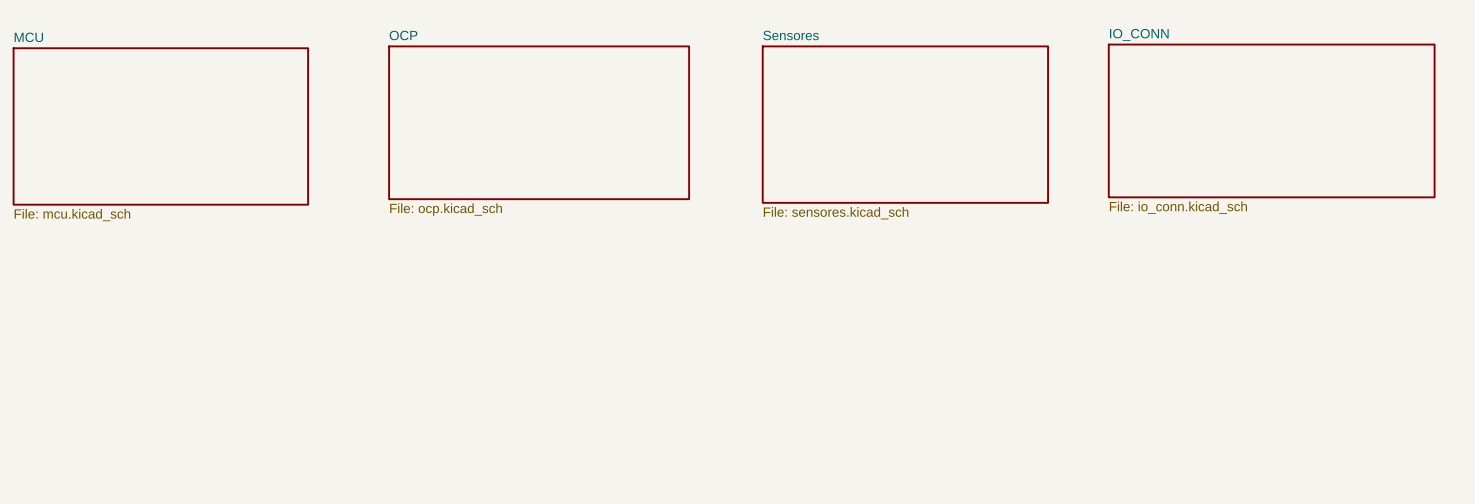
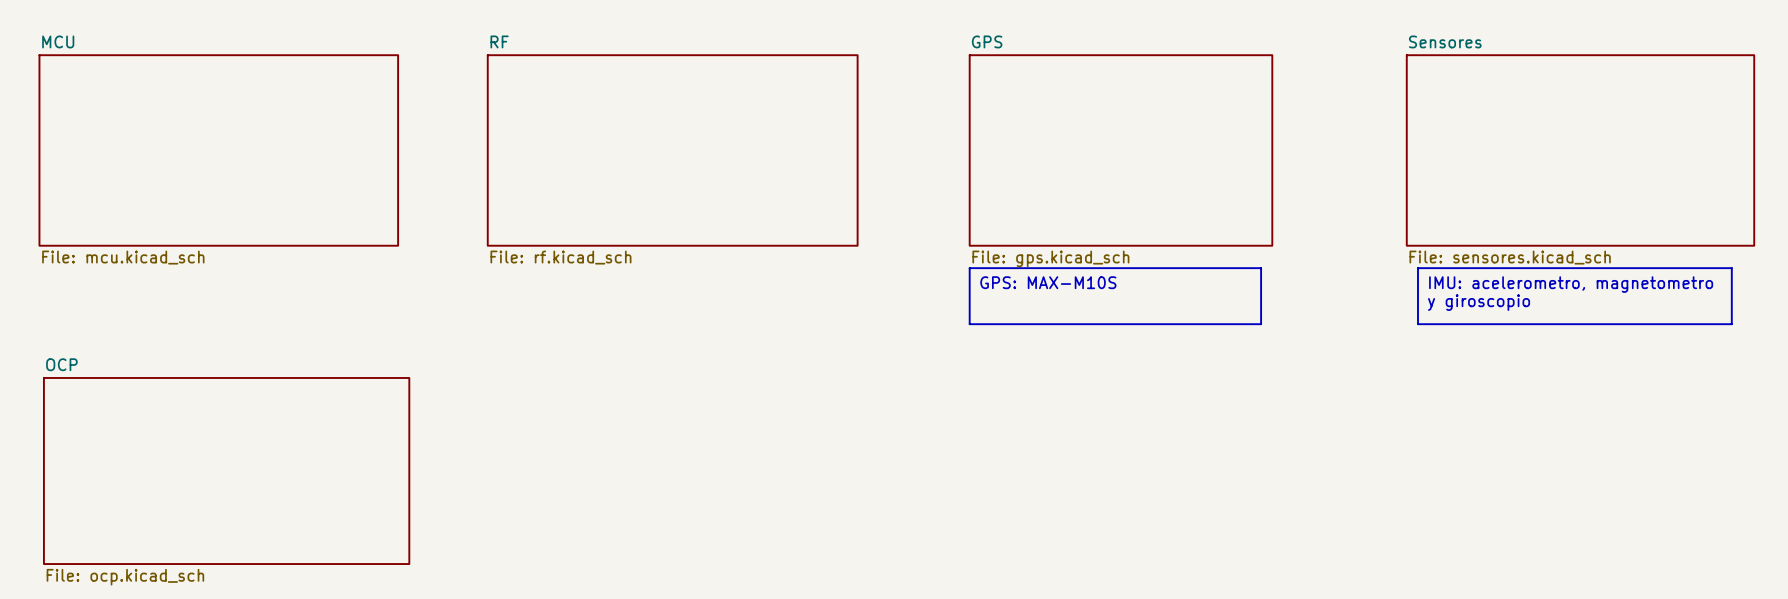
sheet IO_CONN: File: io_conn.kicad_sch (1271, 120) -> none
sheet OCP: File: ocp.kicad_sch (539, 122) -> none
sheet Sensores: File: sensores.kicad_sch (905, 124) -> none
sheet RF: none -> File: rf.kicad_sch (672, 150)
sheet GPS: none -> File: gps.kicad_sch (1120, 150)
sheet Sensores: none -> File: sensores.kicad_sch (1580, 150)
line: none -> (969, 268) (1261, 268) (1261, 324) (969, 324) (969, 268)
line: none -> (1417, 268) (1731, 268) (1731, 324) (1417, 324) (1417, 268)
text: none -> GPS: MAX-M10S (1048, 282)
text: none -> IMU: acelerometro, magnetometro (1571, 284)
text: none -> y giroscopio (1479, 302)
sheet OCP: none -> File: ocp.kicad_sch (226, 471)

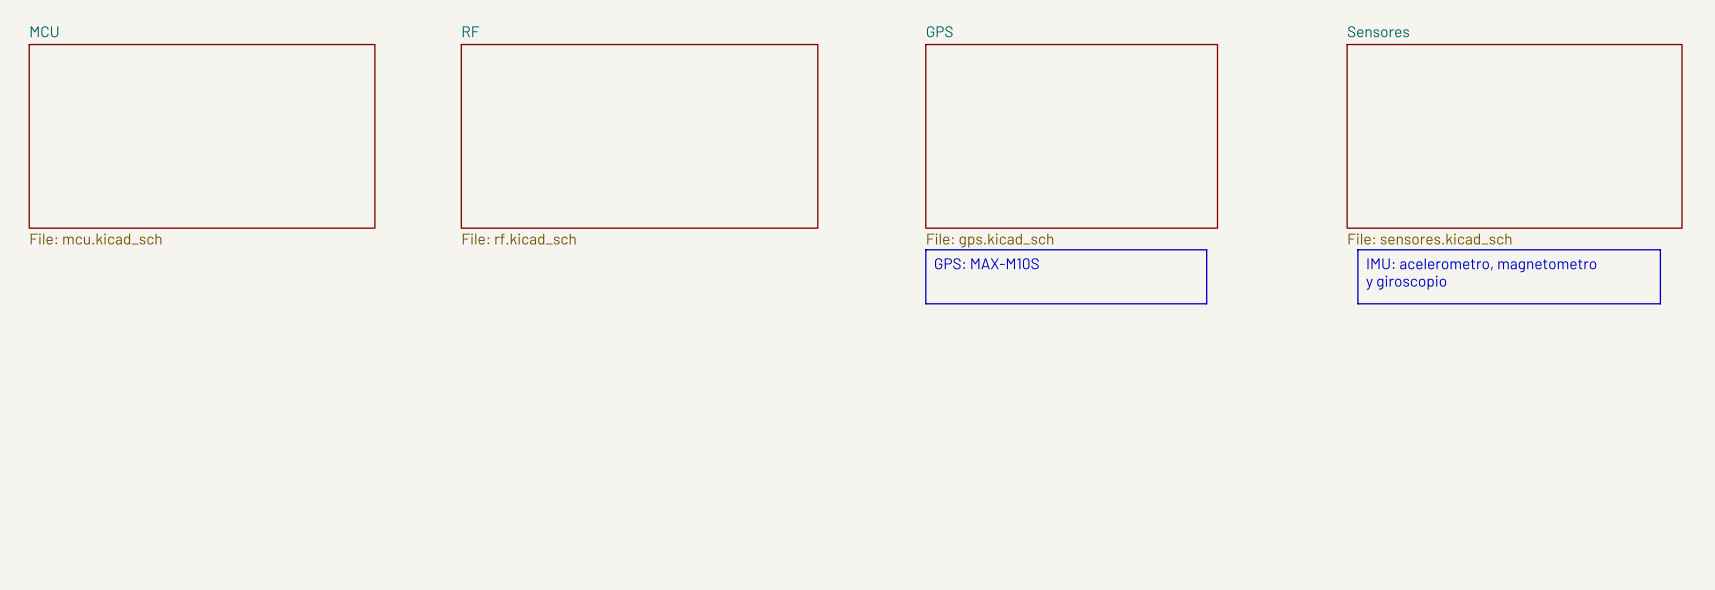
sheet OCP: File: ocp.kicad_sch (226, 471) -> none

